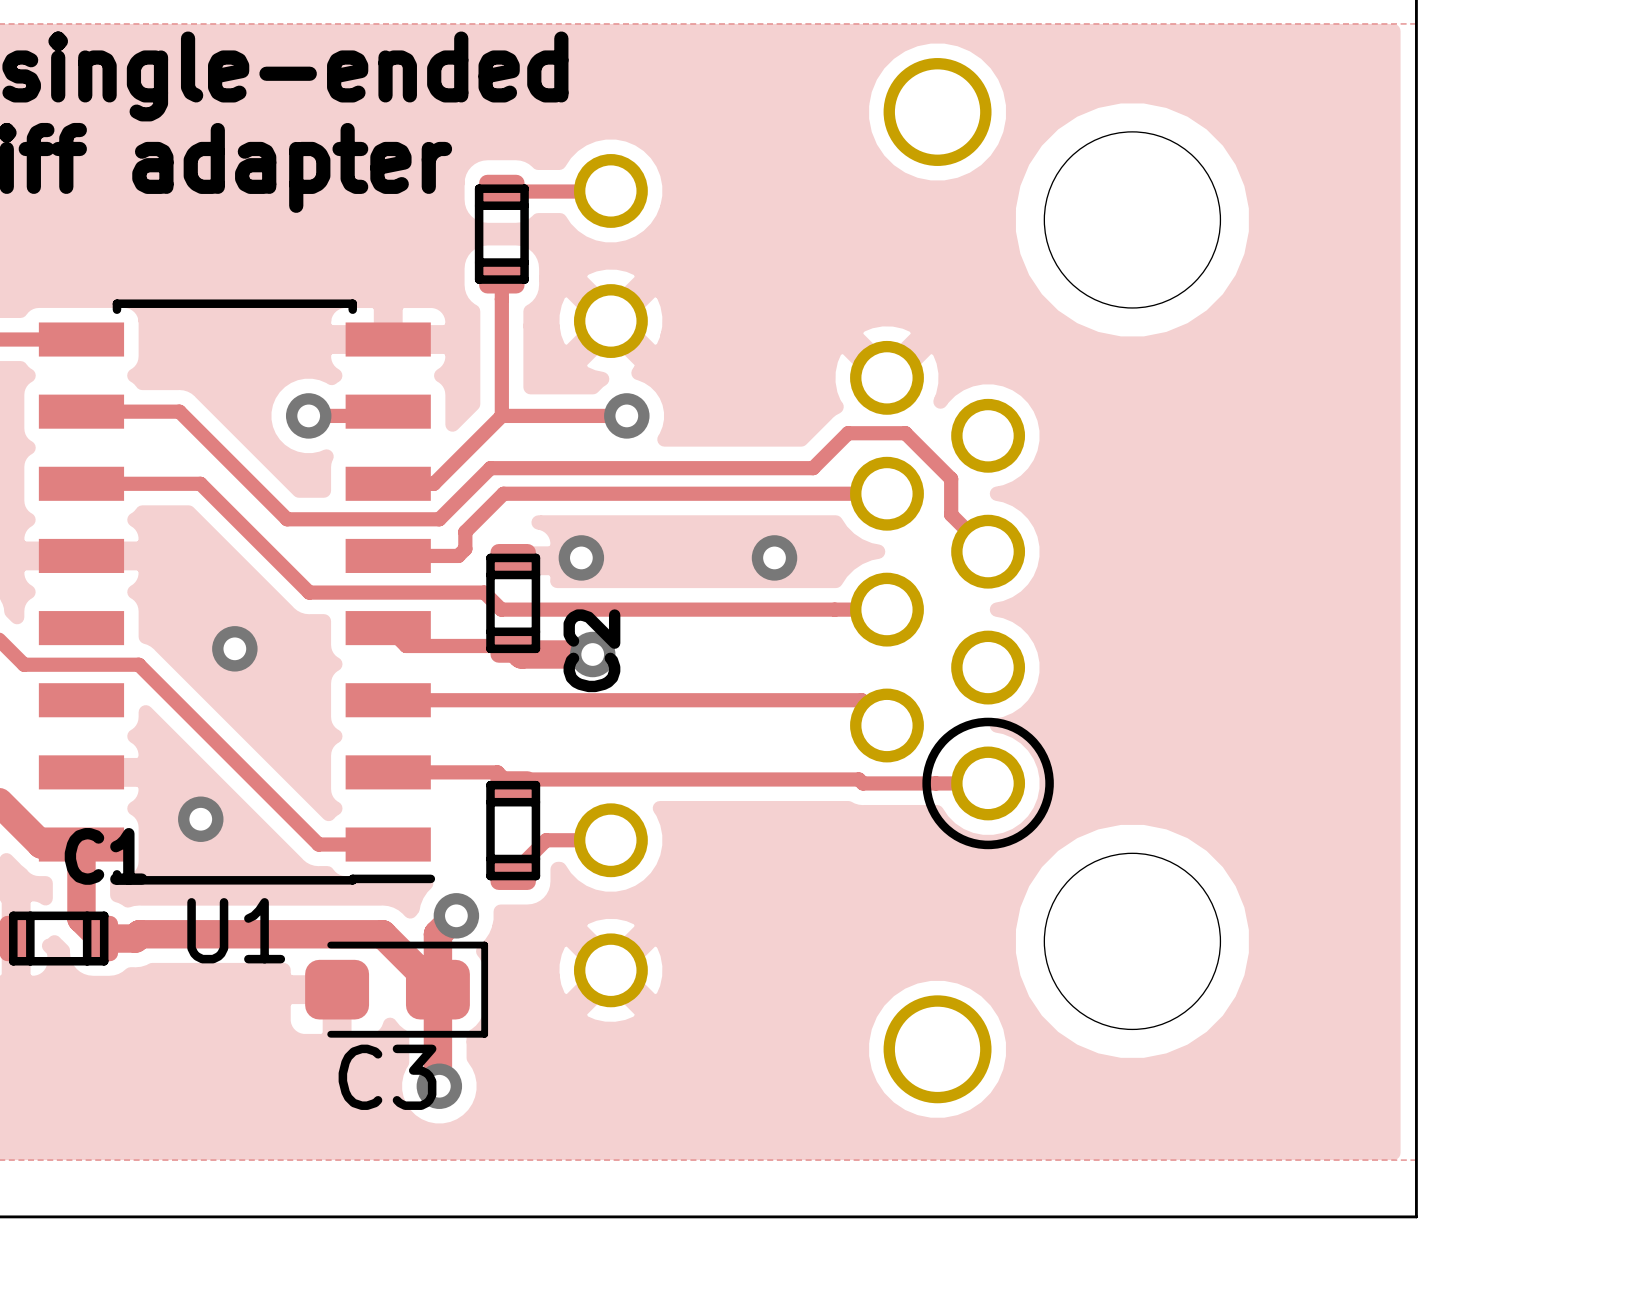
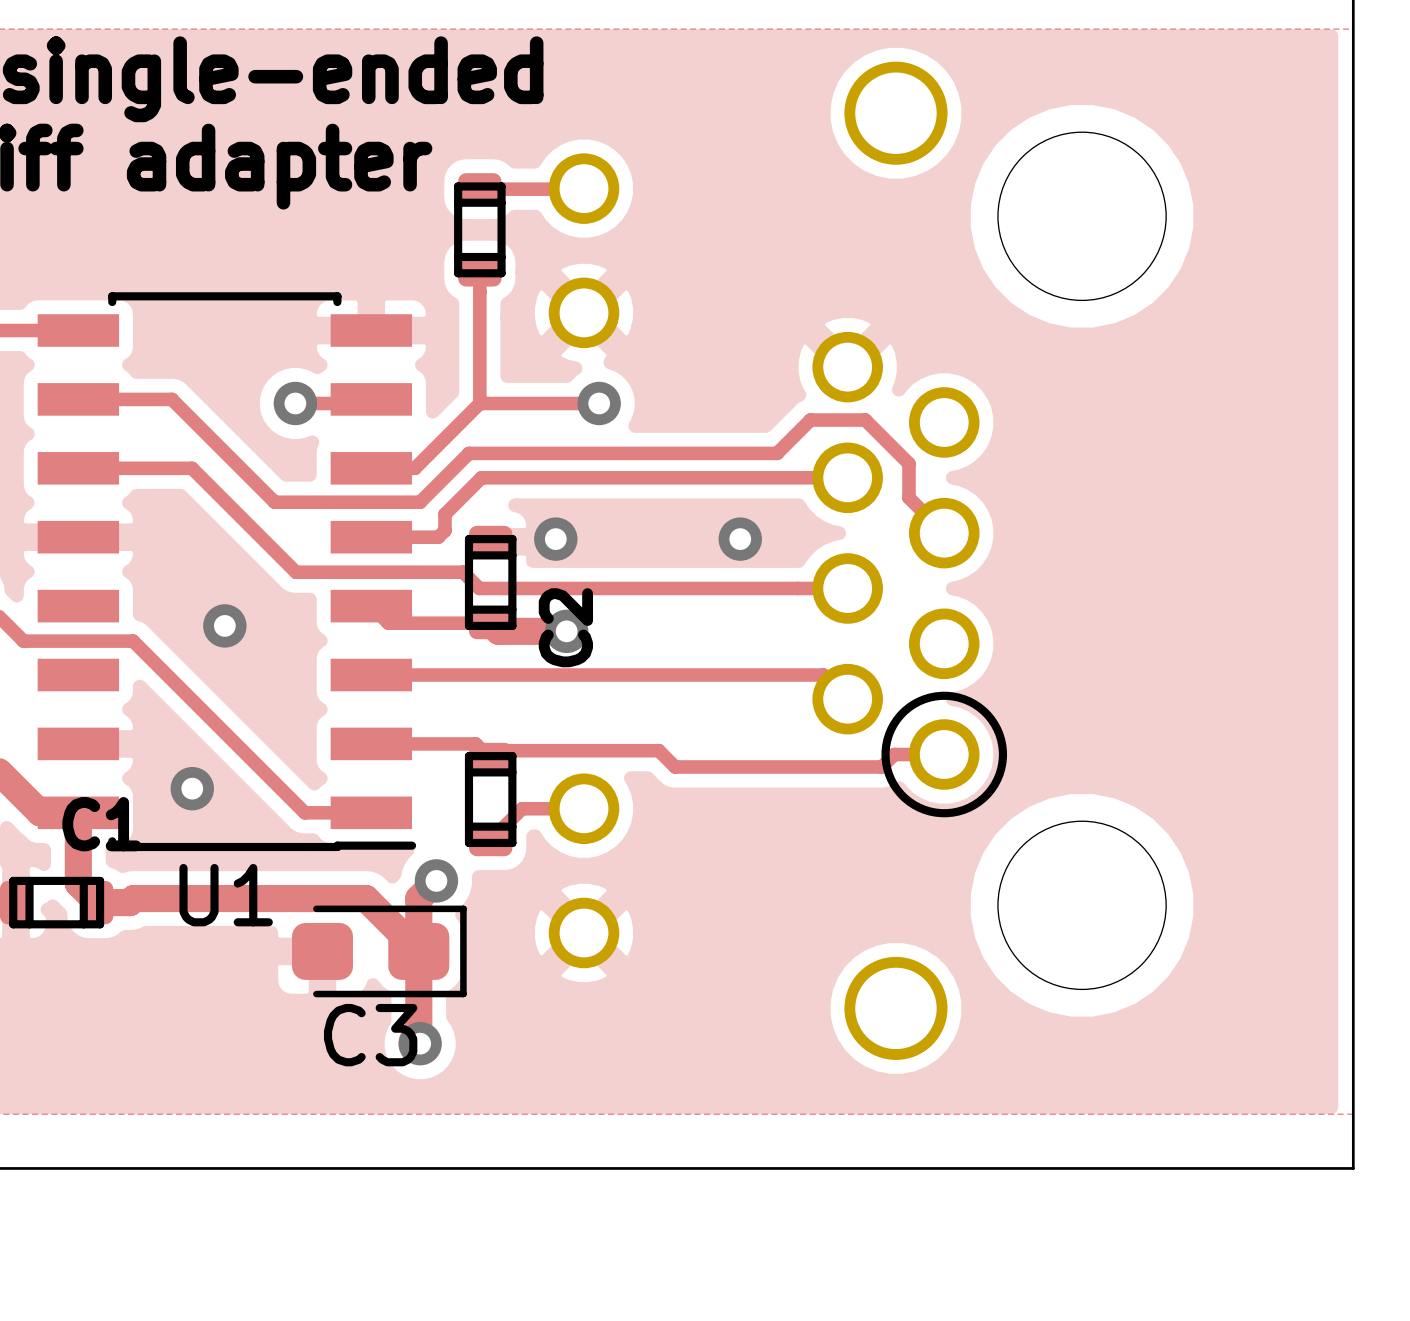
track: (689, 779) (858, 779) (862, 783) (935, 783) -> (658, 750) (675, 766) (881, 766) (894, 754)

